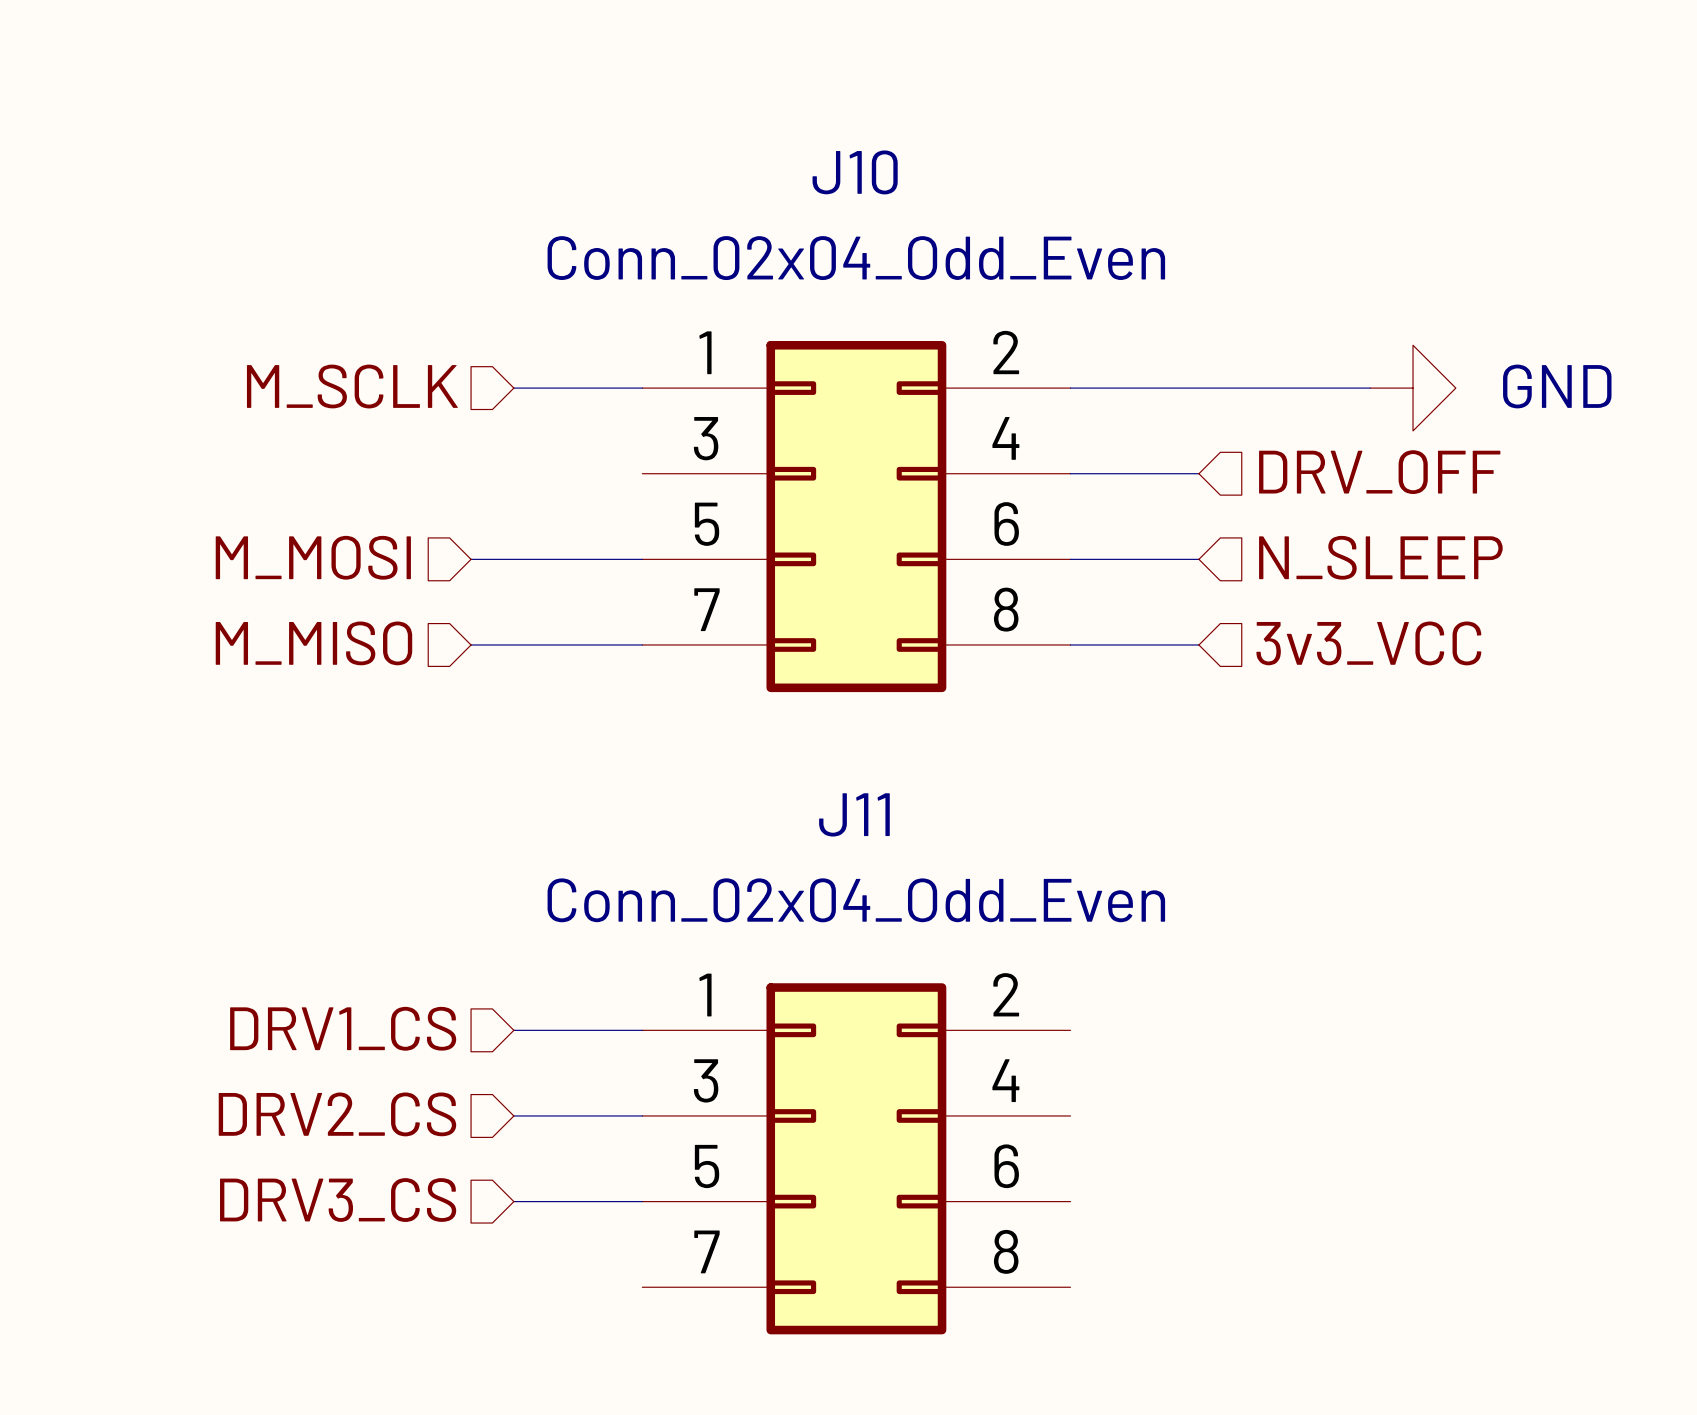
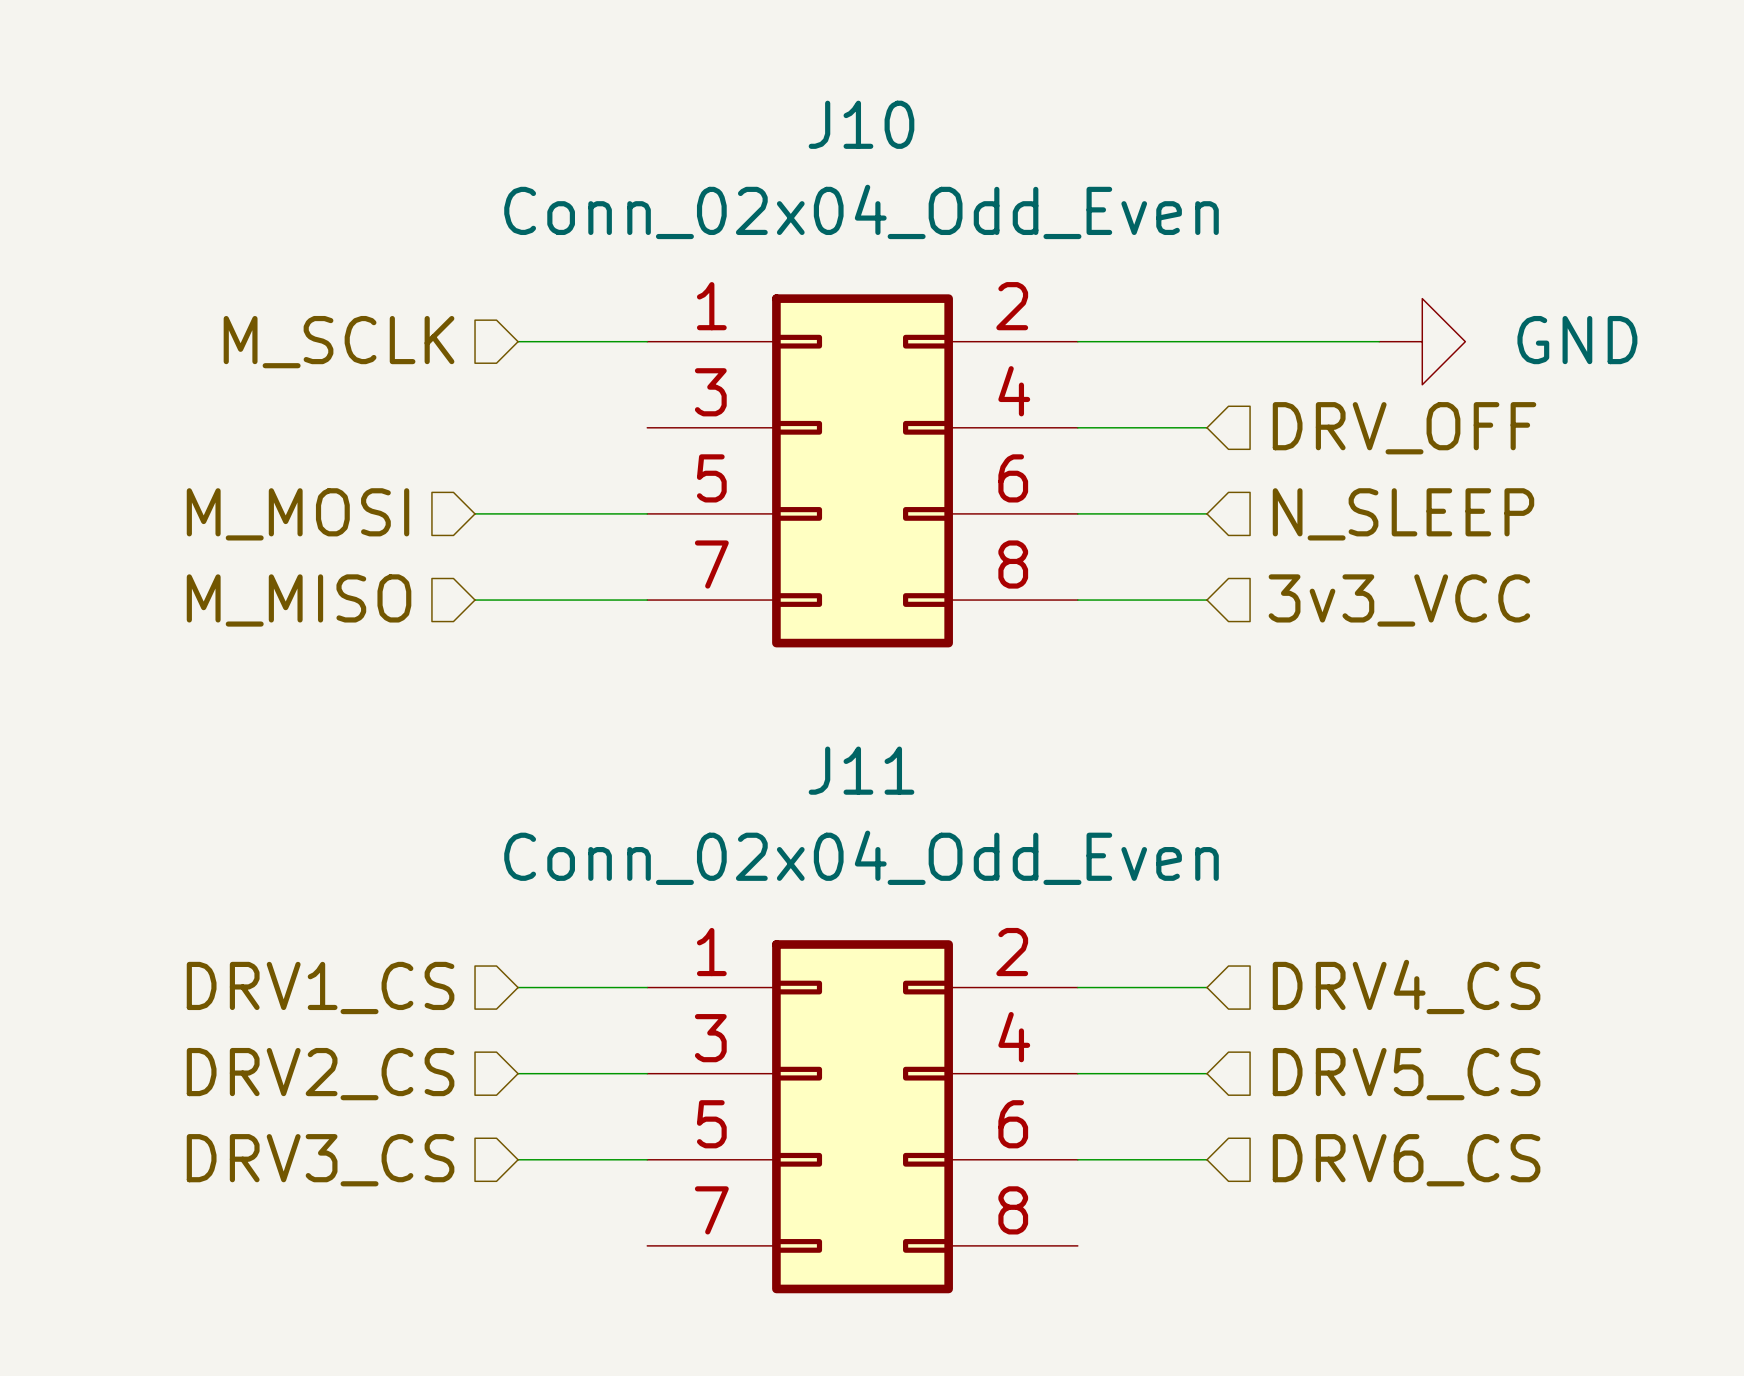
hierarchical label: none -> DRV4_CS (1406, 986)
wire: none -> (1077, 987) (1207, 987)
hierarchical label: none -> DRV5_CS (1406, 1074)
wire: none -> (1077, 1073) (1207, 1073)
hierarchical label: none -> DRV6_CS (1406, 1160)
wire: none -> (1077, 1159) (1207, 1159)

